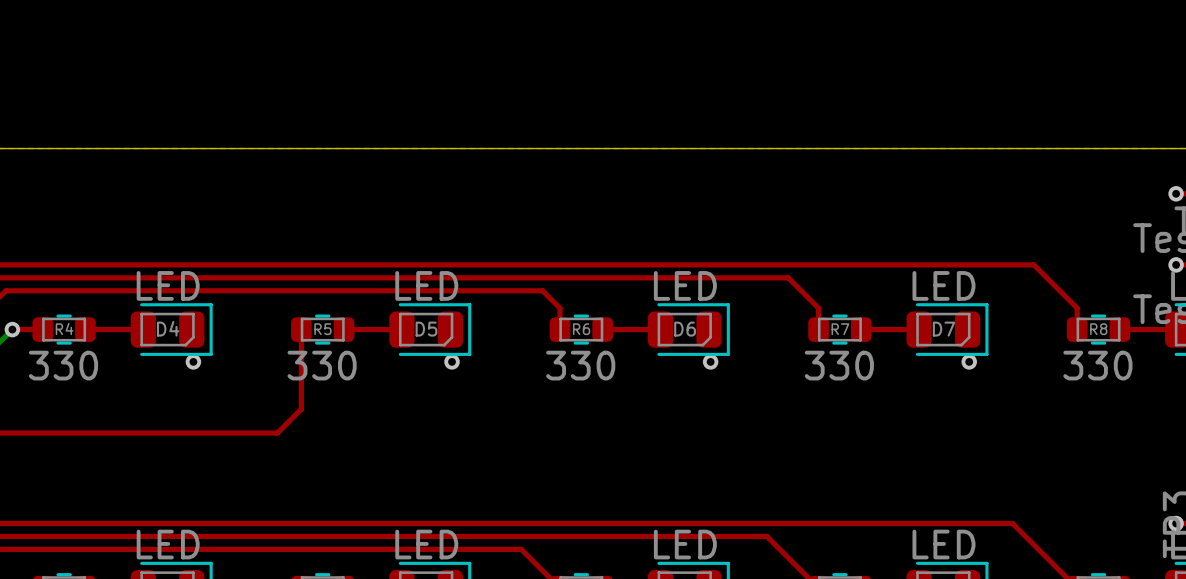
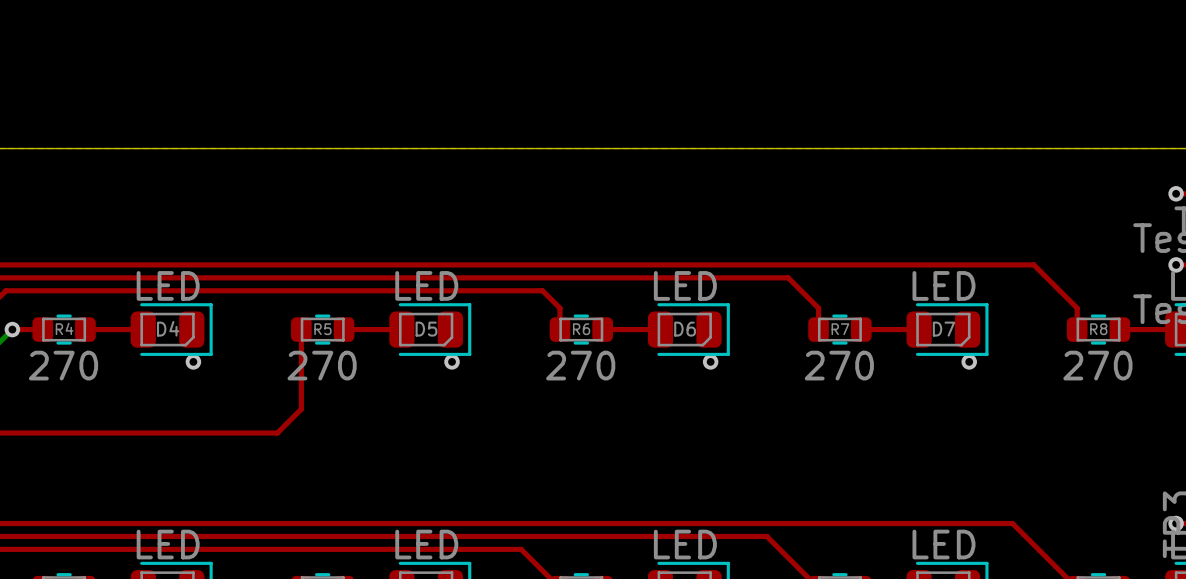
R4 value: 330 (63, 365) -> 270 (63, 365)
R5 value: 330 (322, 365) -> 270 (322, 365)
R6 value: 330 (580, 365) -> 270 (580, 365)
R7 value: 330 (839, 365) -> 270 (839, 365)
R8 value: 330 (1097, 365) -> 270 (1097, 365)

